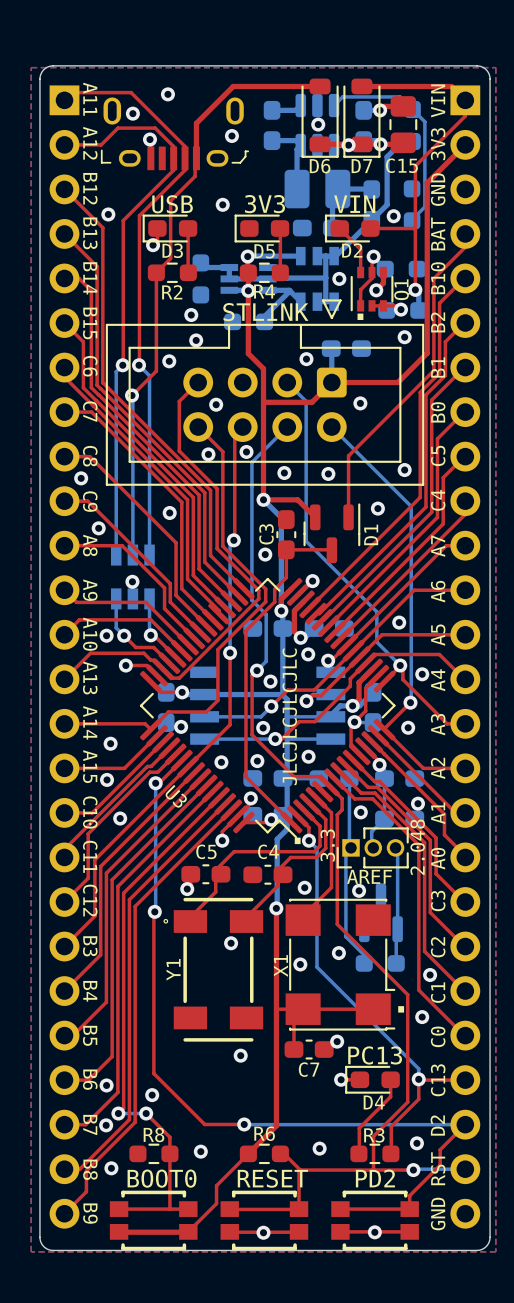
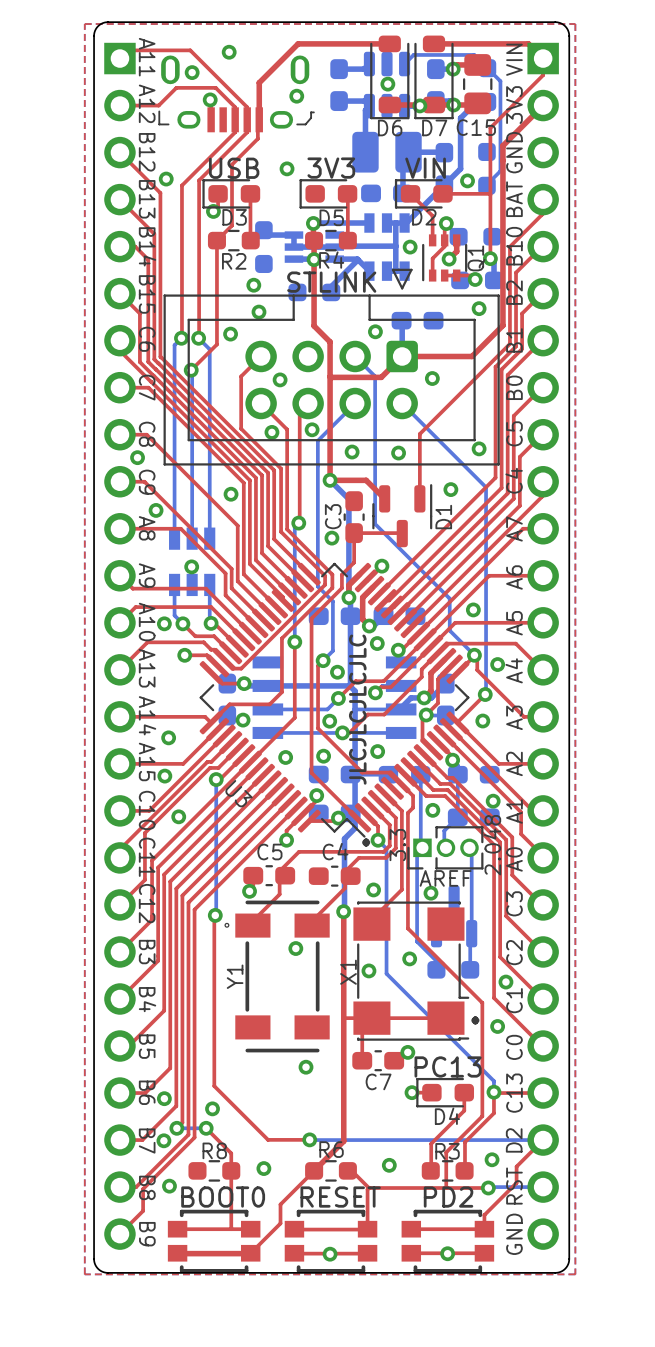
text: . (360, 316) -> none

